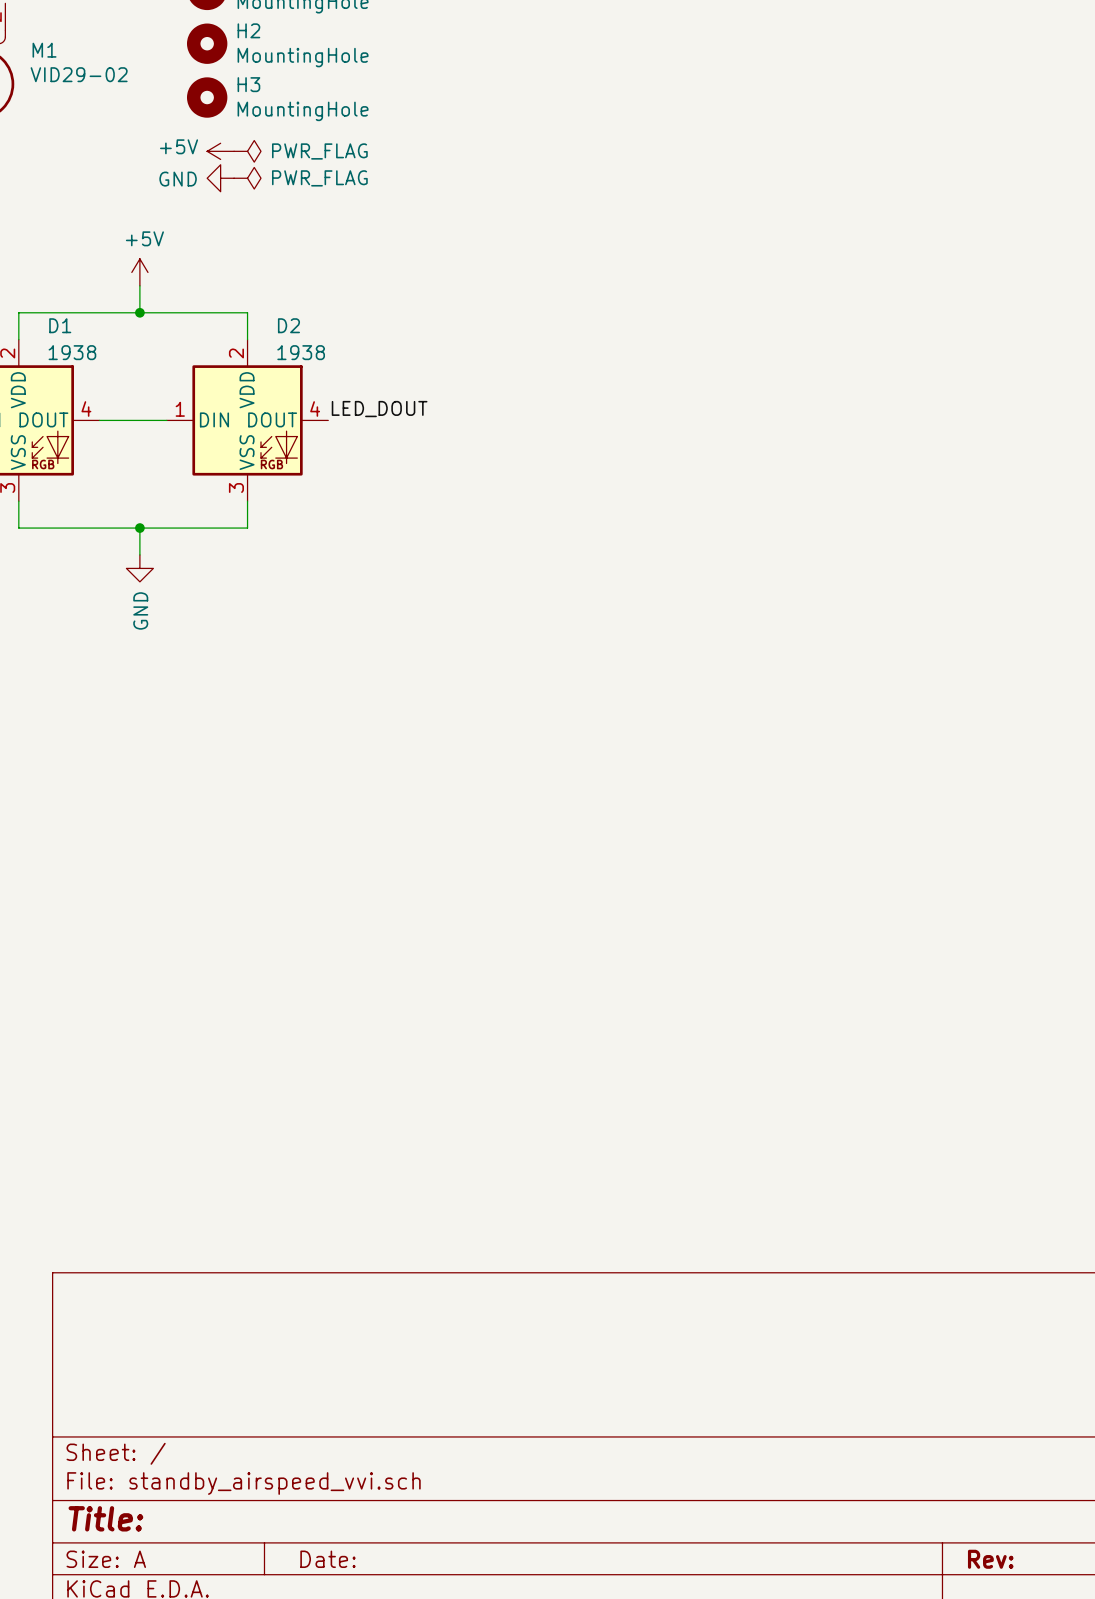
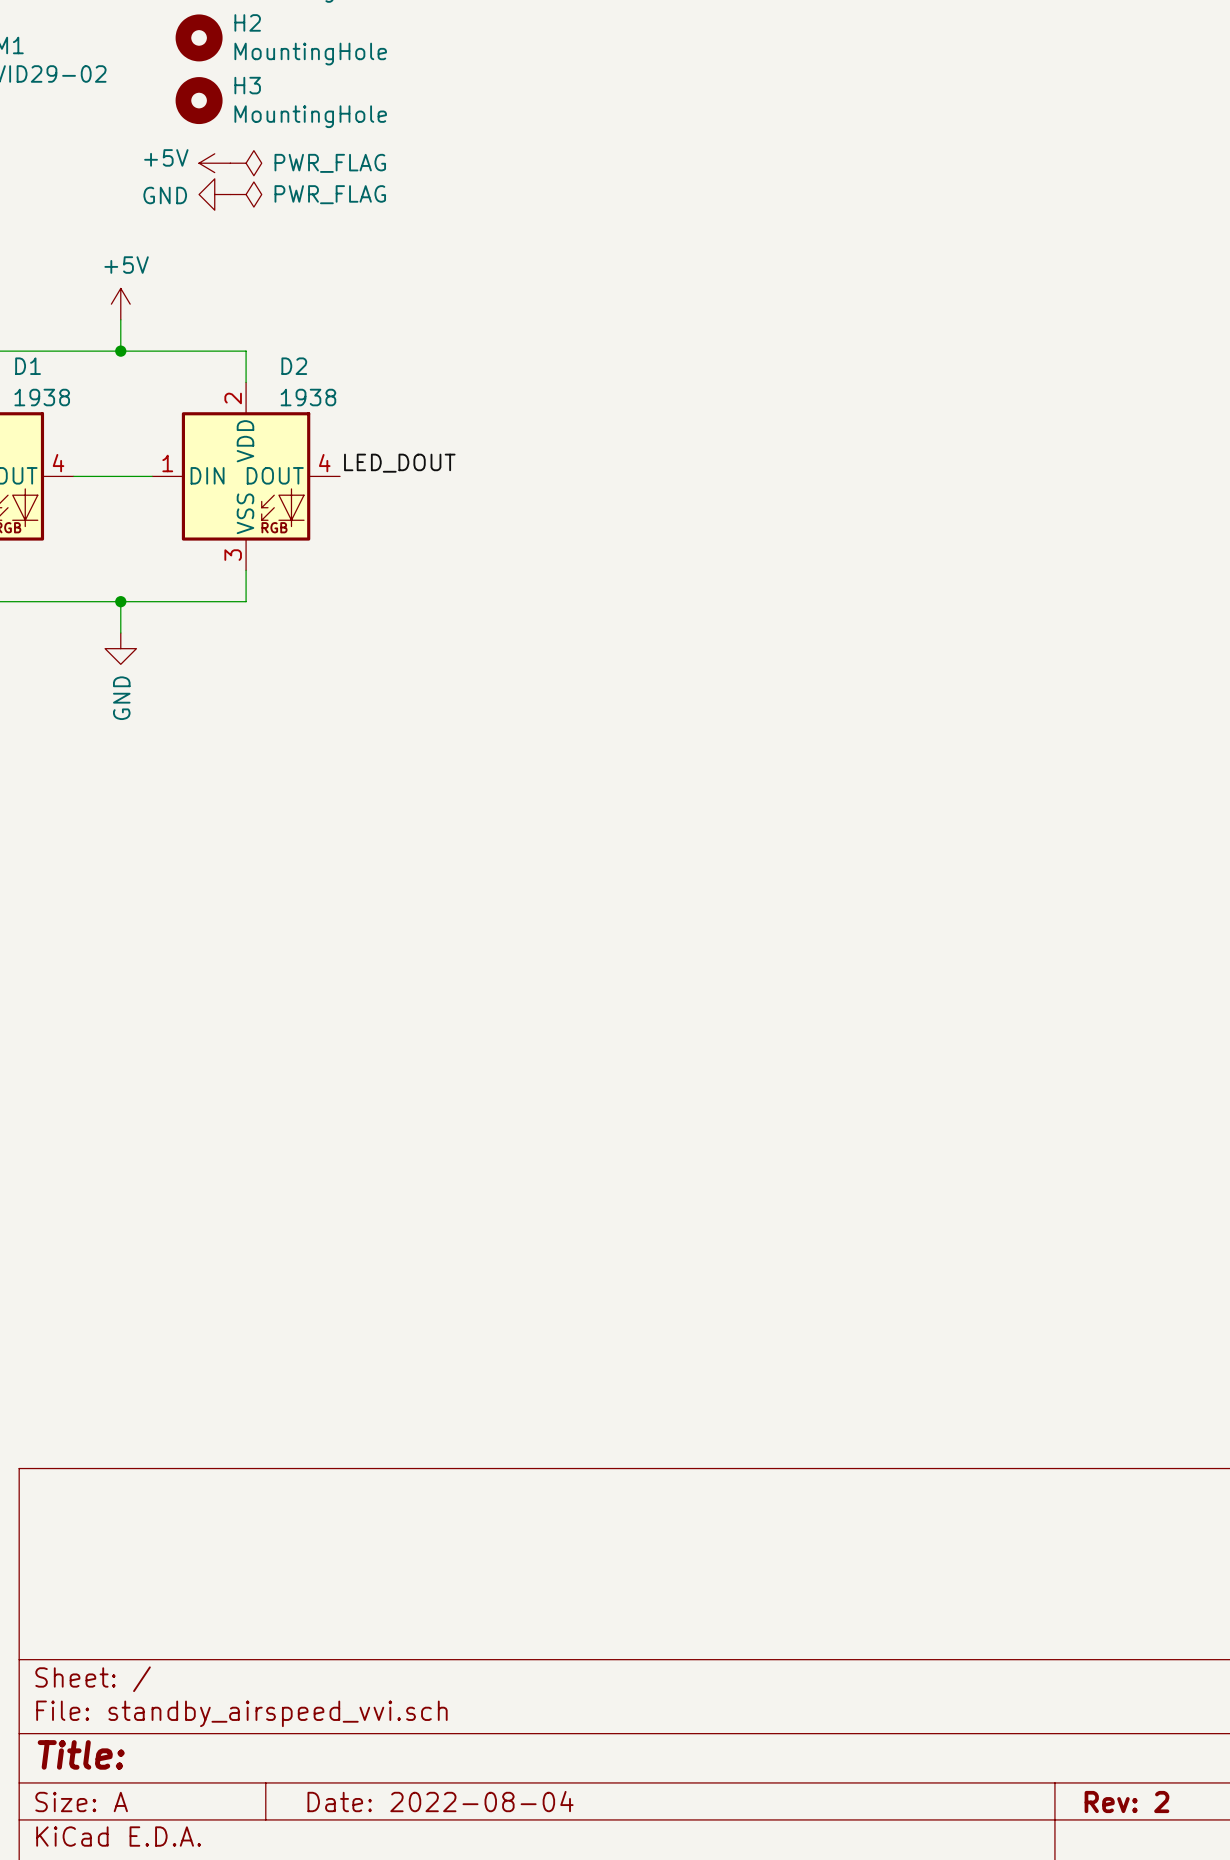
title block: Date: (327, 1559) -> Date: 2022-08-04 (440, 1801)
title block: Rev: (990, 1559) -> Rev: 2 (1126, 1802)

